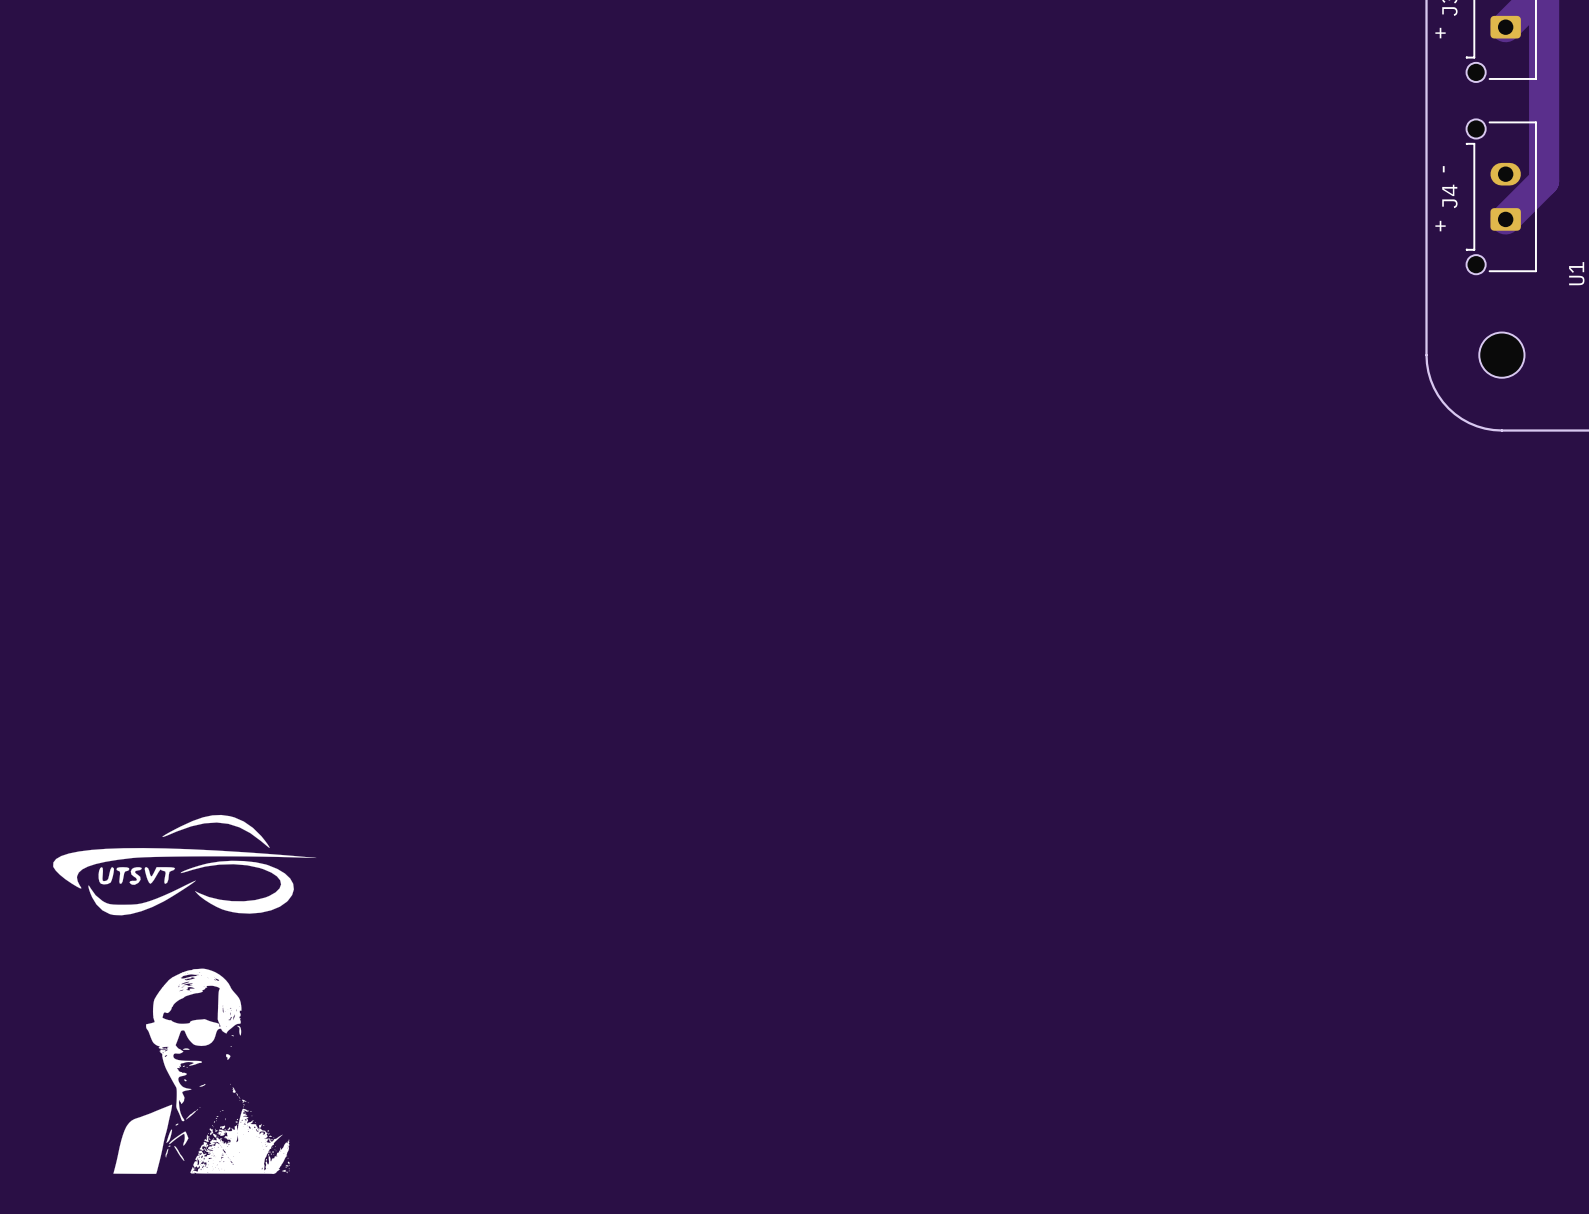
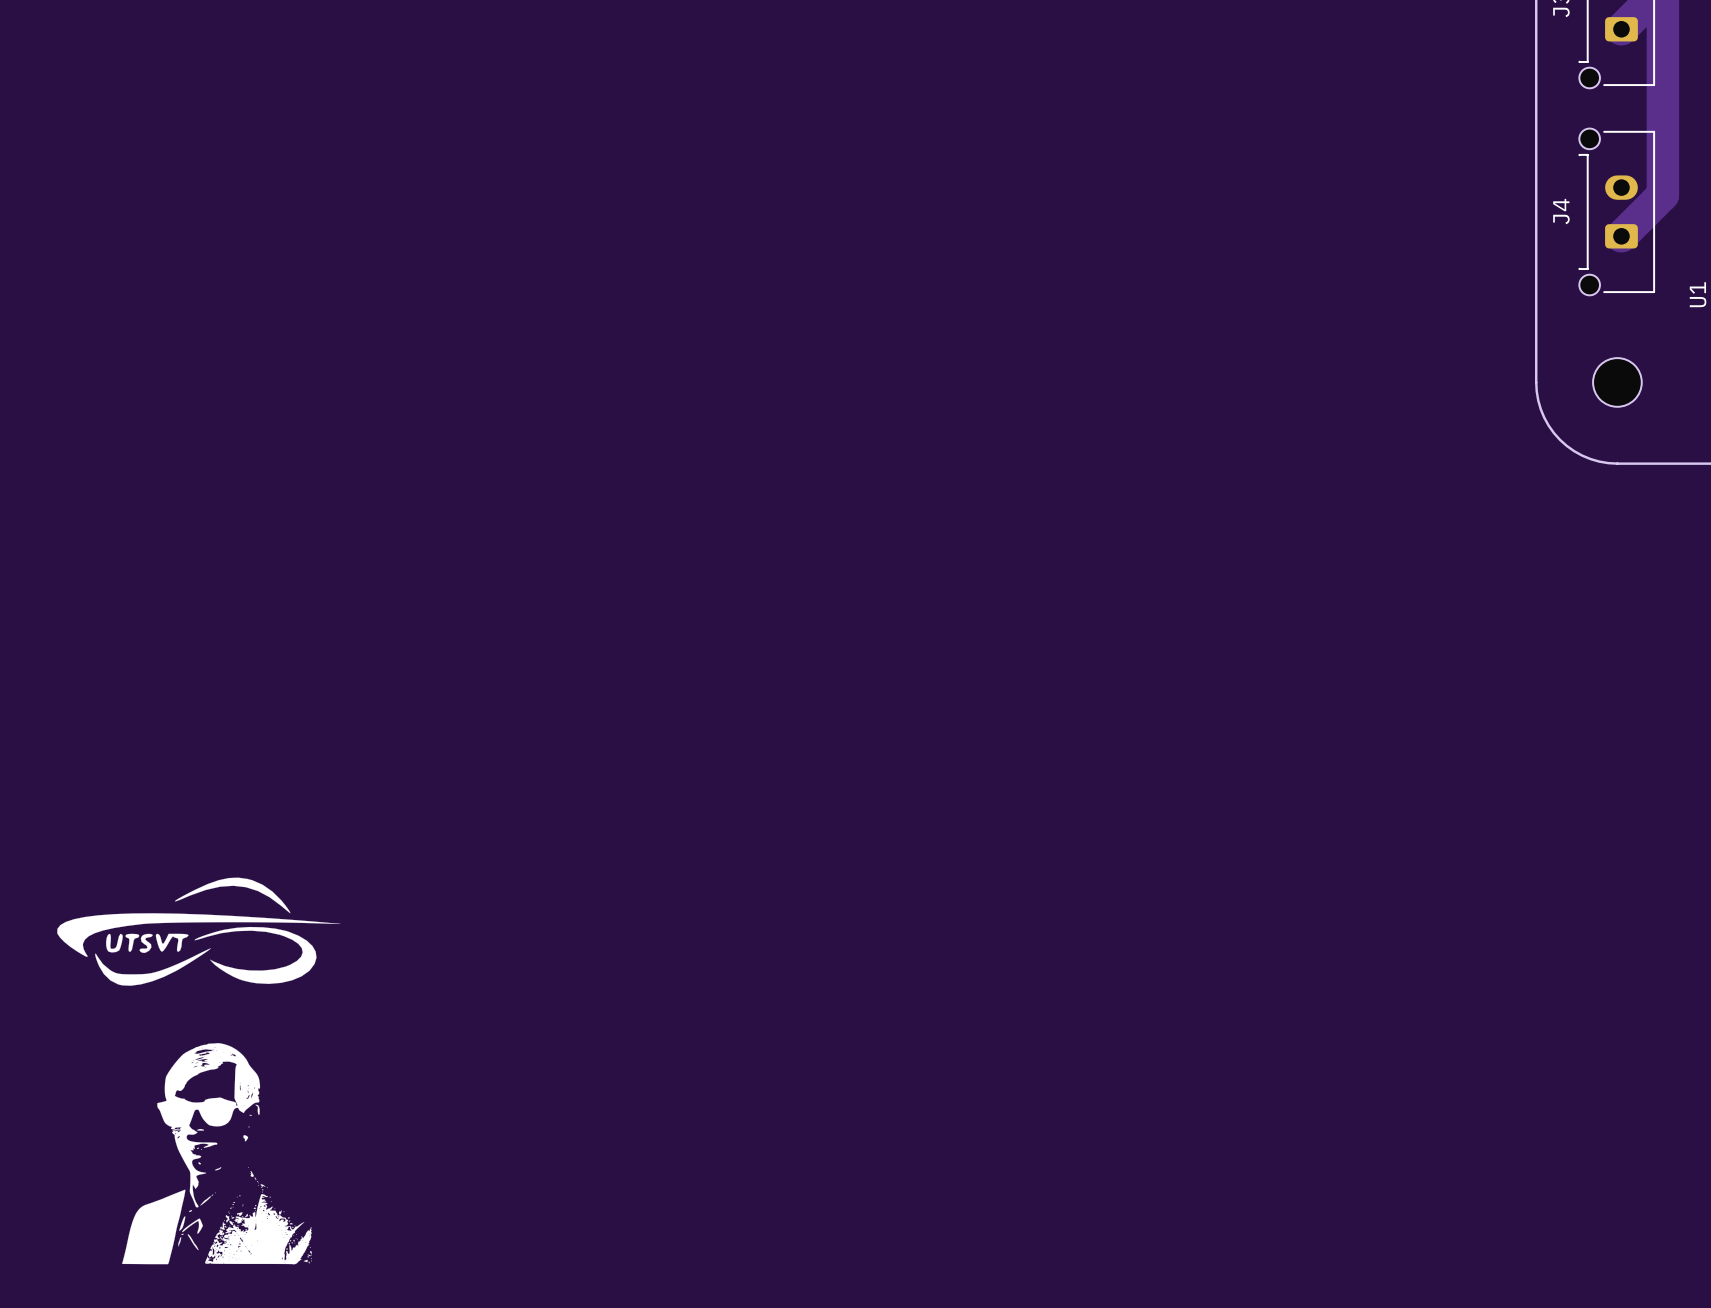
text: + (1440, 33) -> none
text: - (1443, 169) -> none
text: + (1440, 226) -> none

